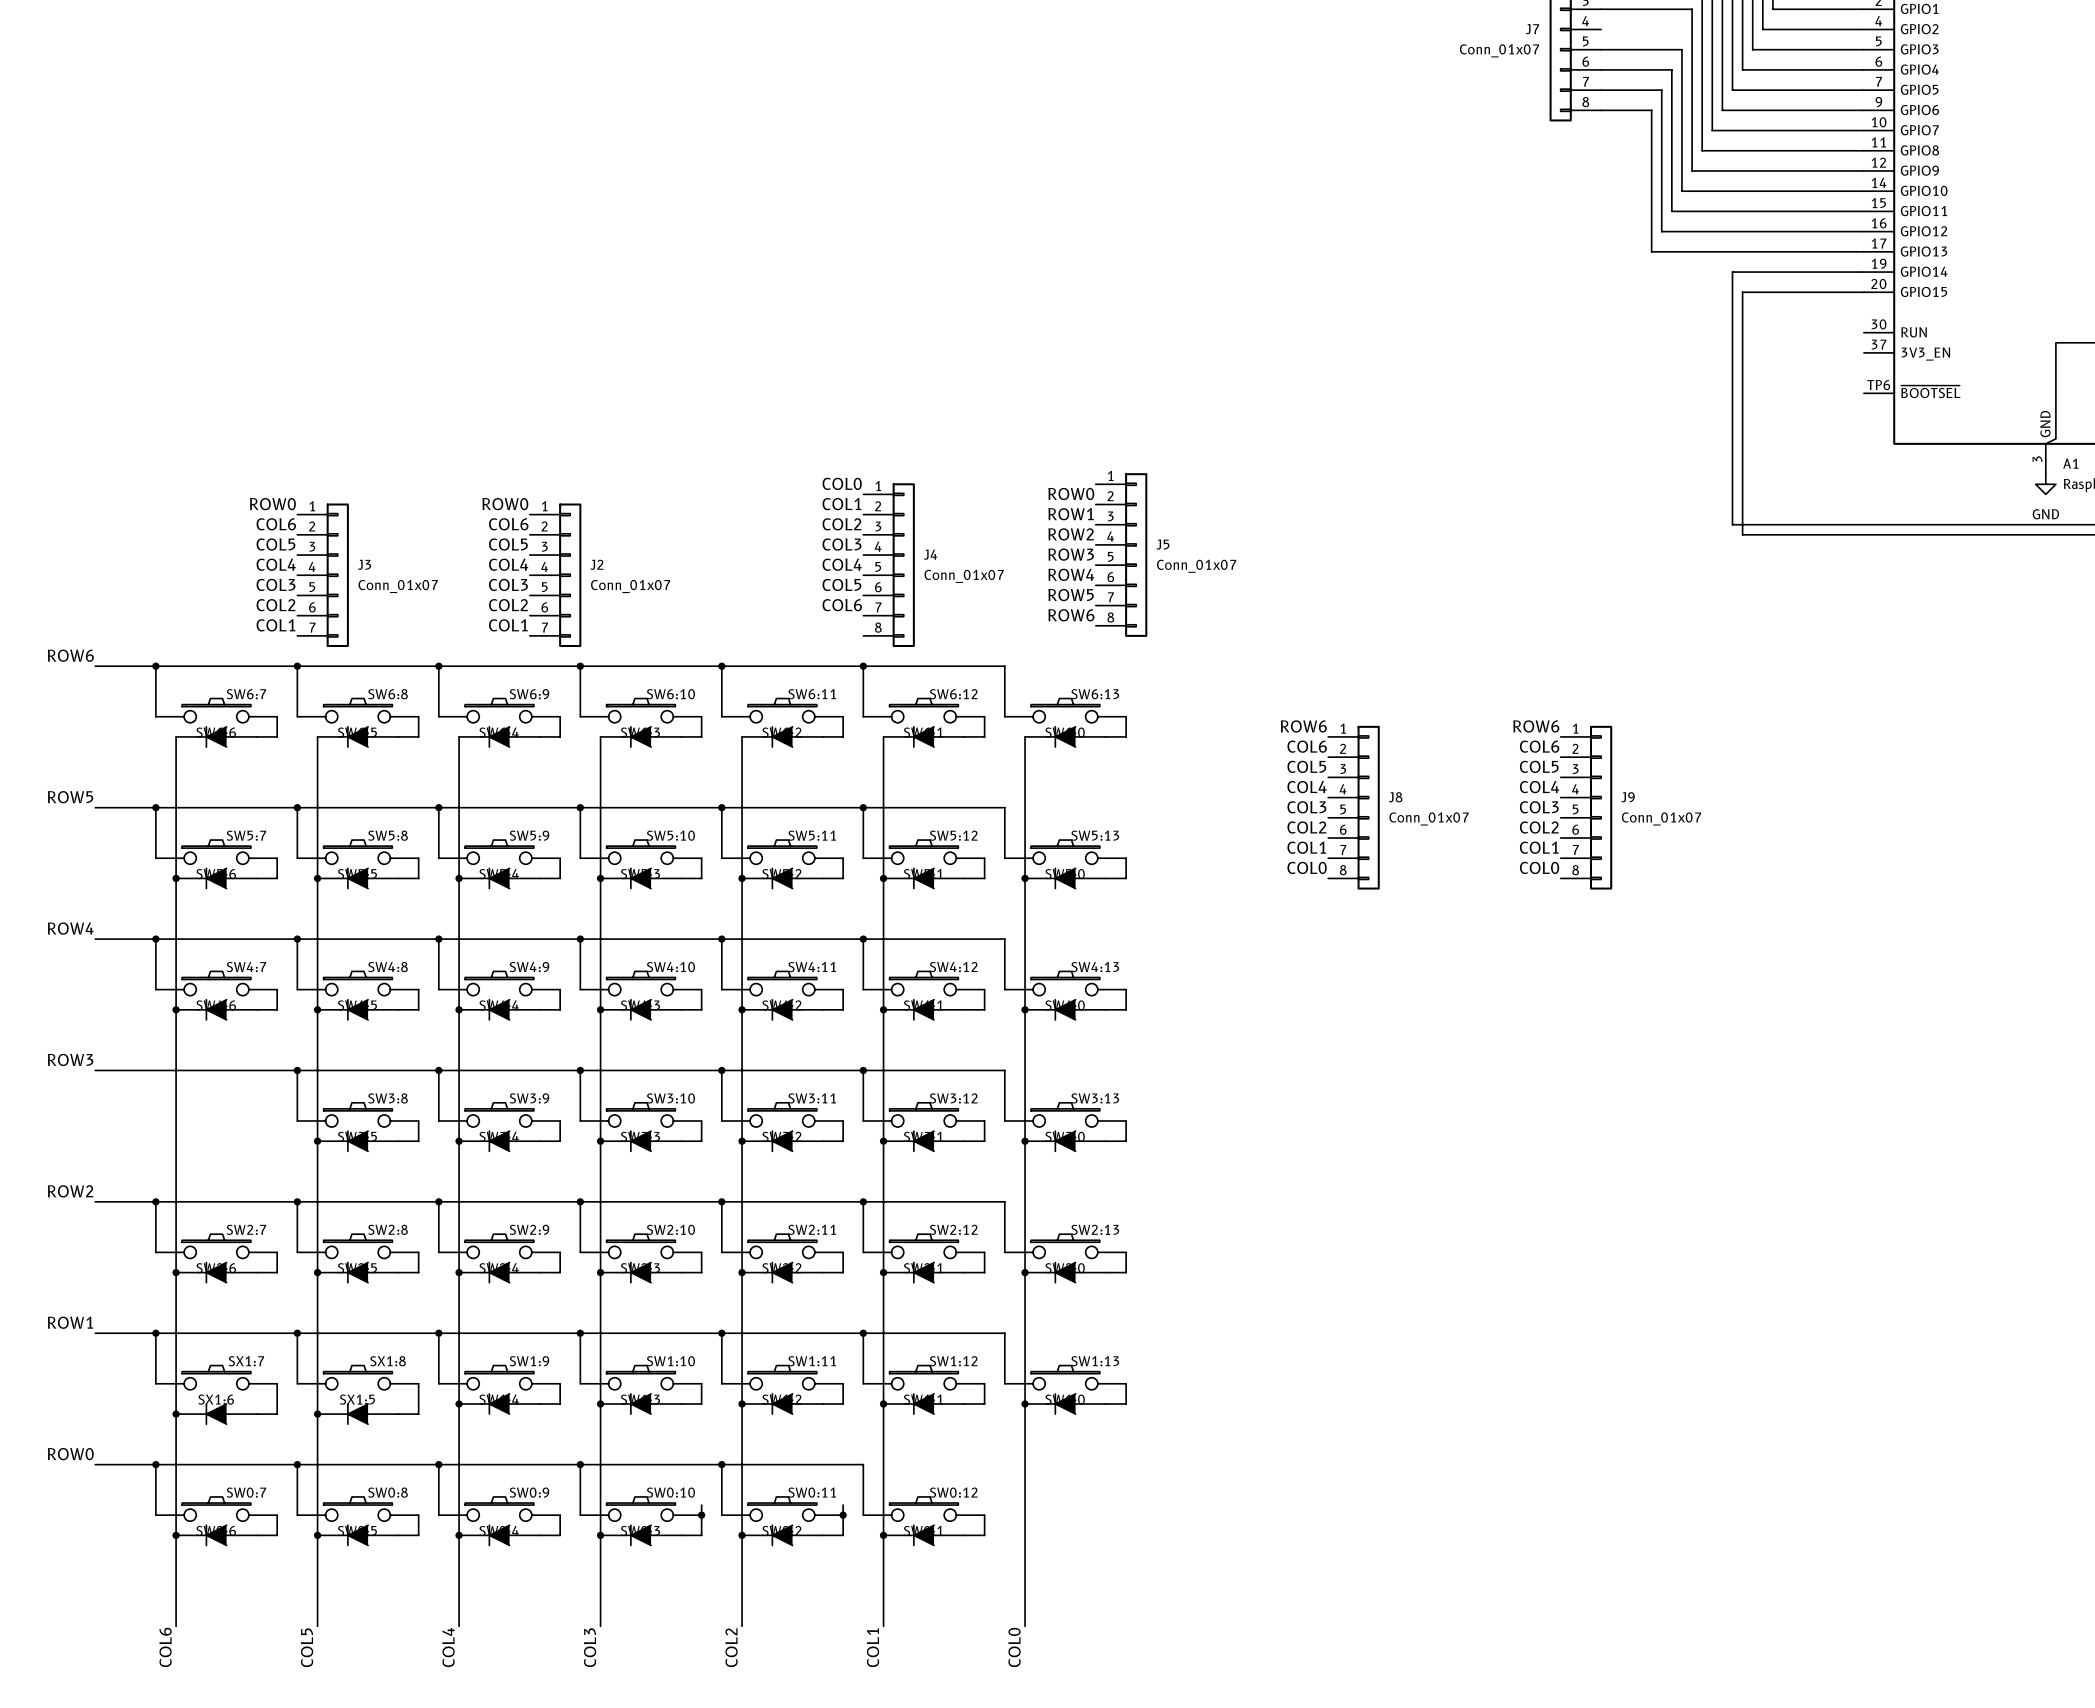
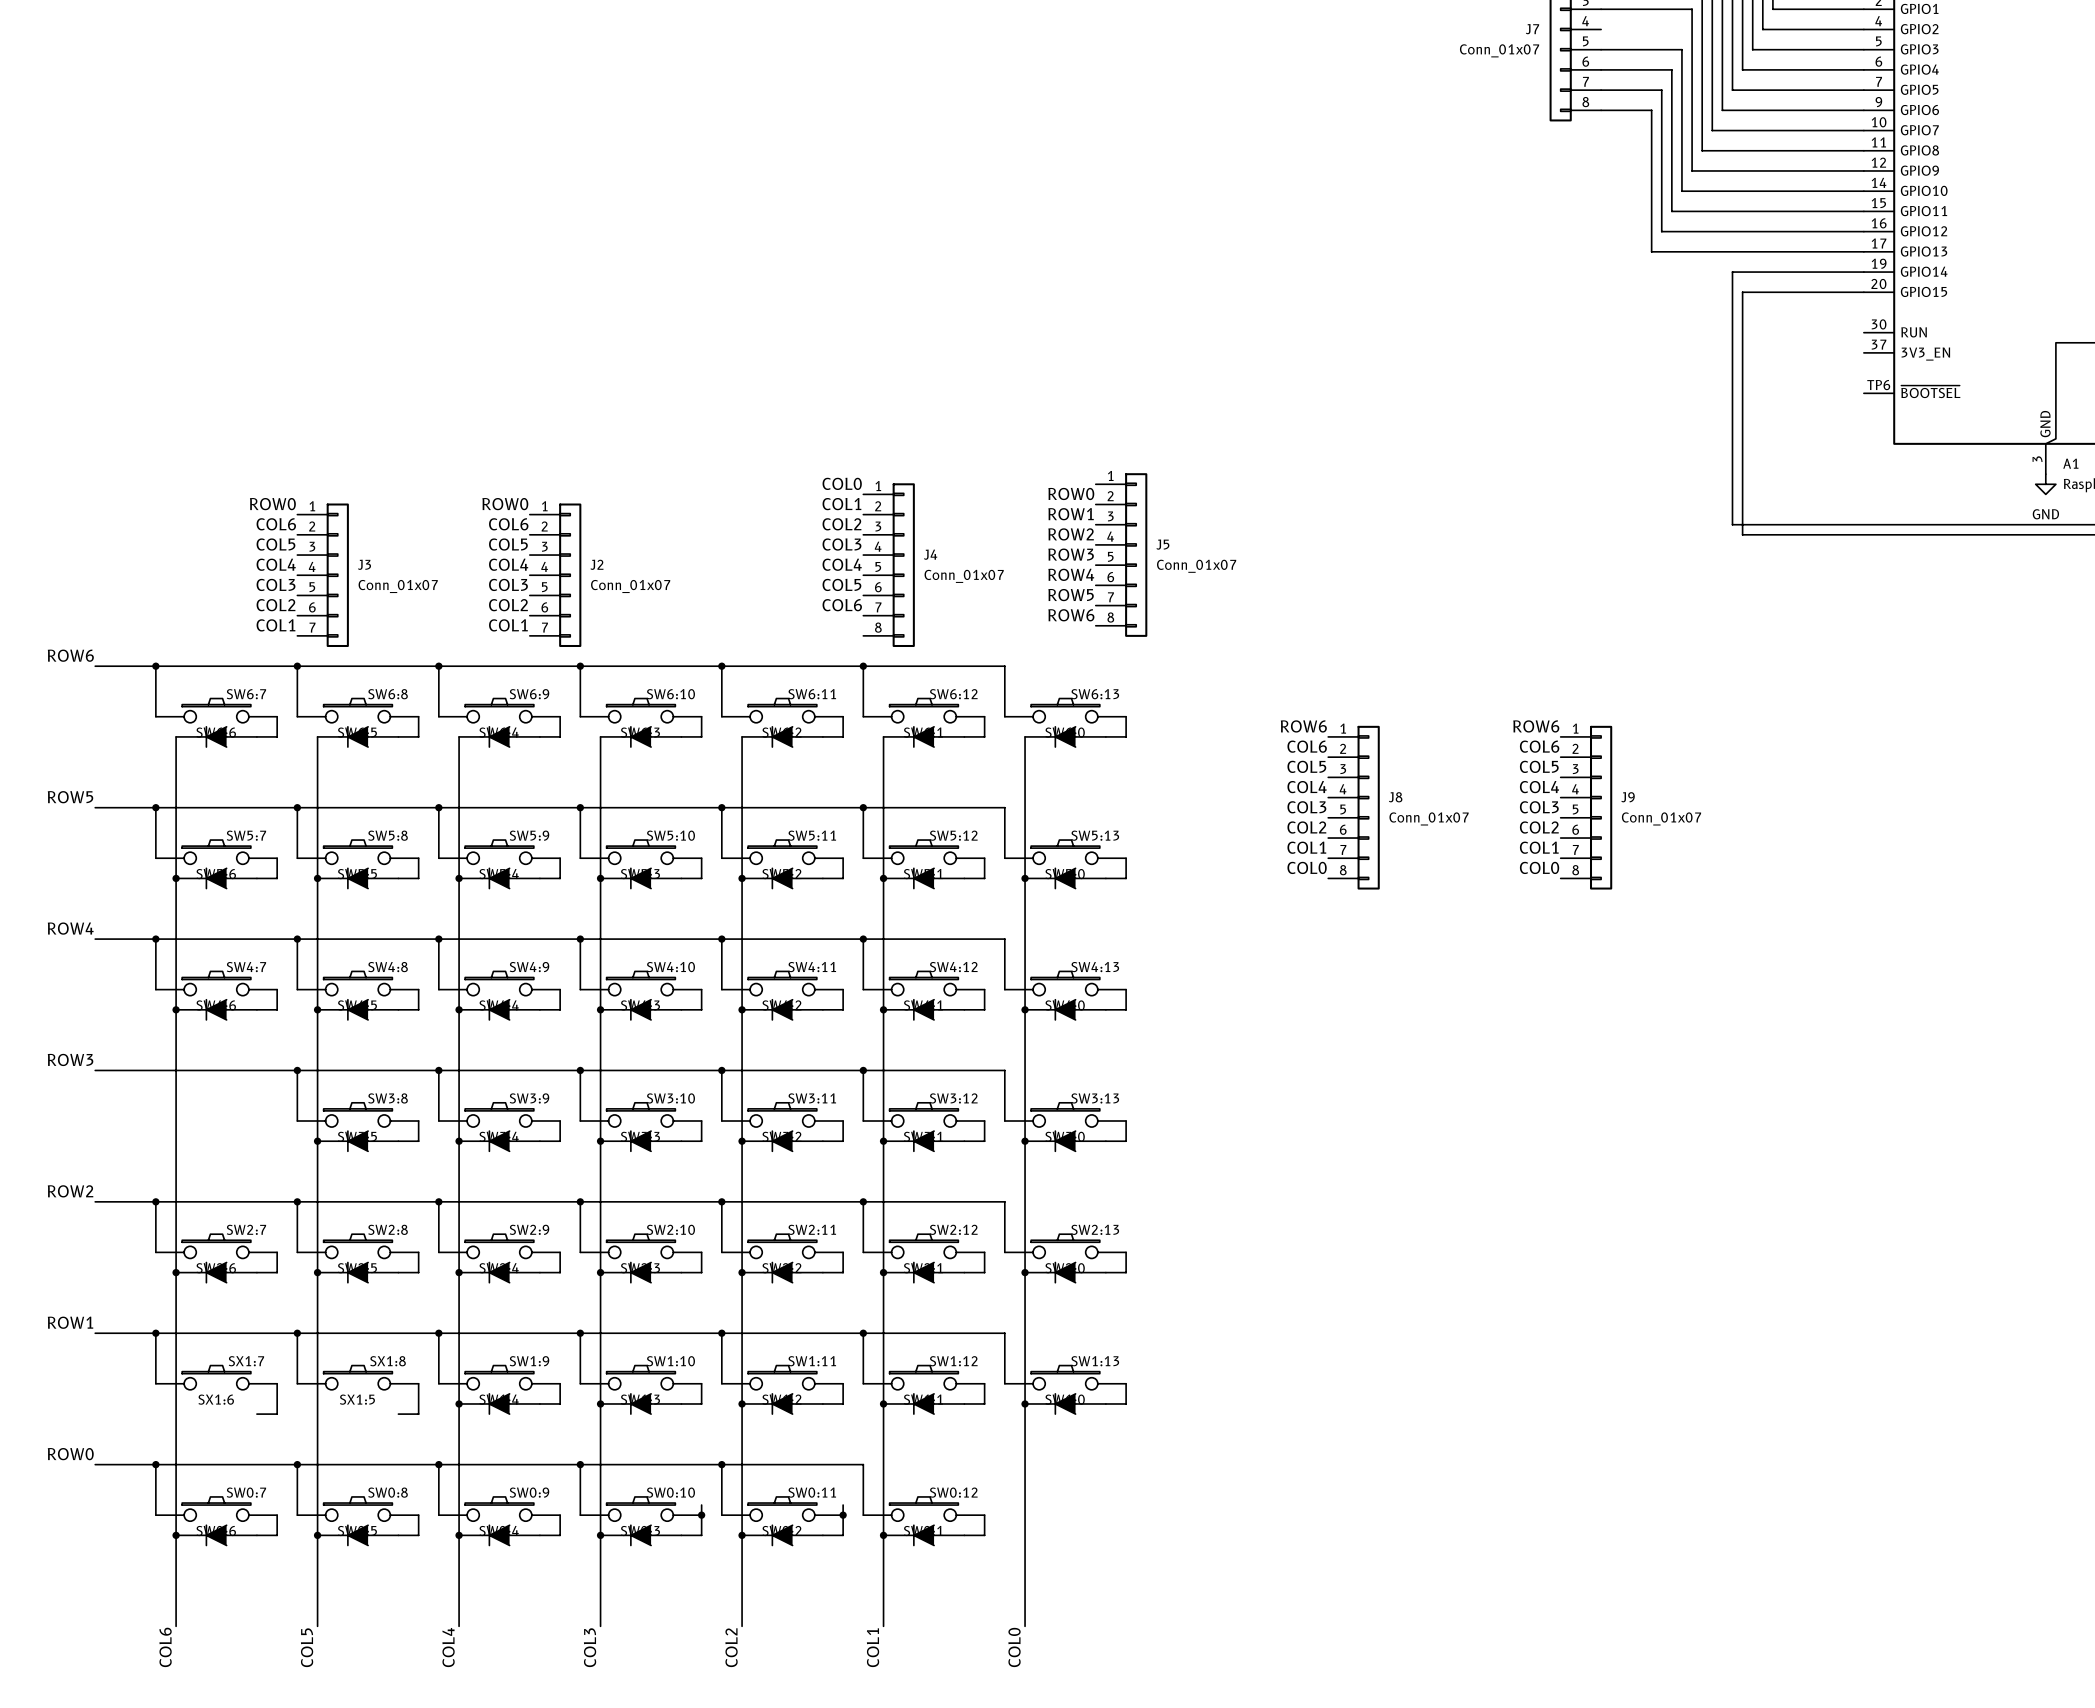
junction: (176, 1414) -> none
part: (216, 1414) -> none
junction: (317, 1414) -> none
part: (358, 1414) -> none

